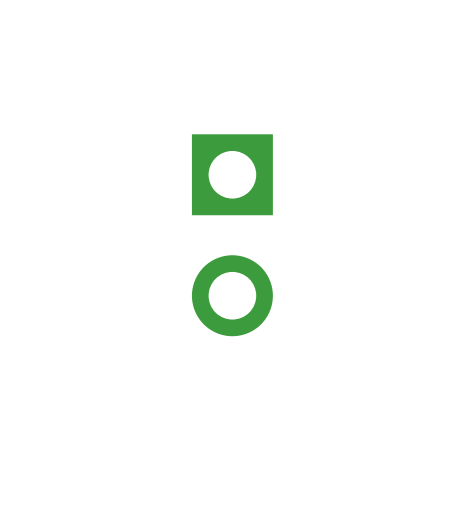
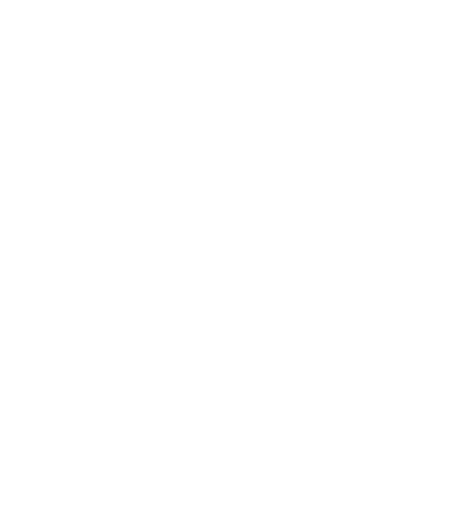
part: (232, 235) -> none

